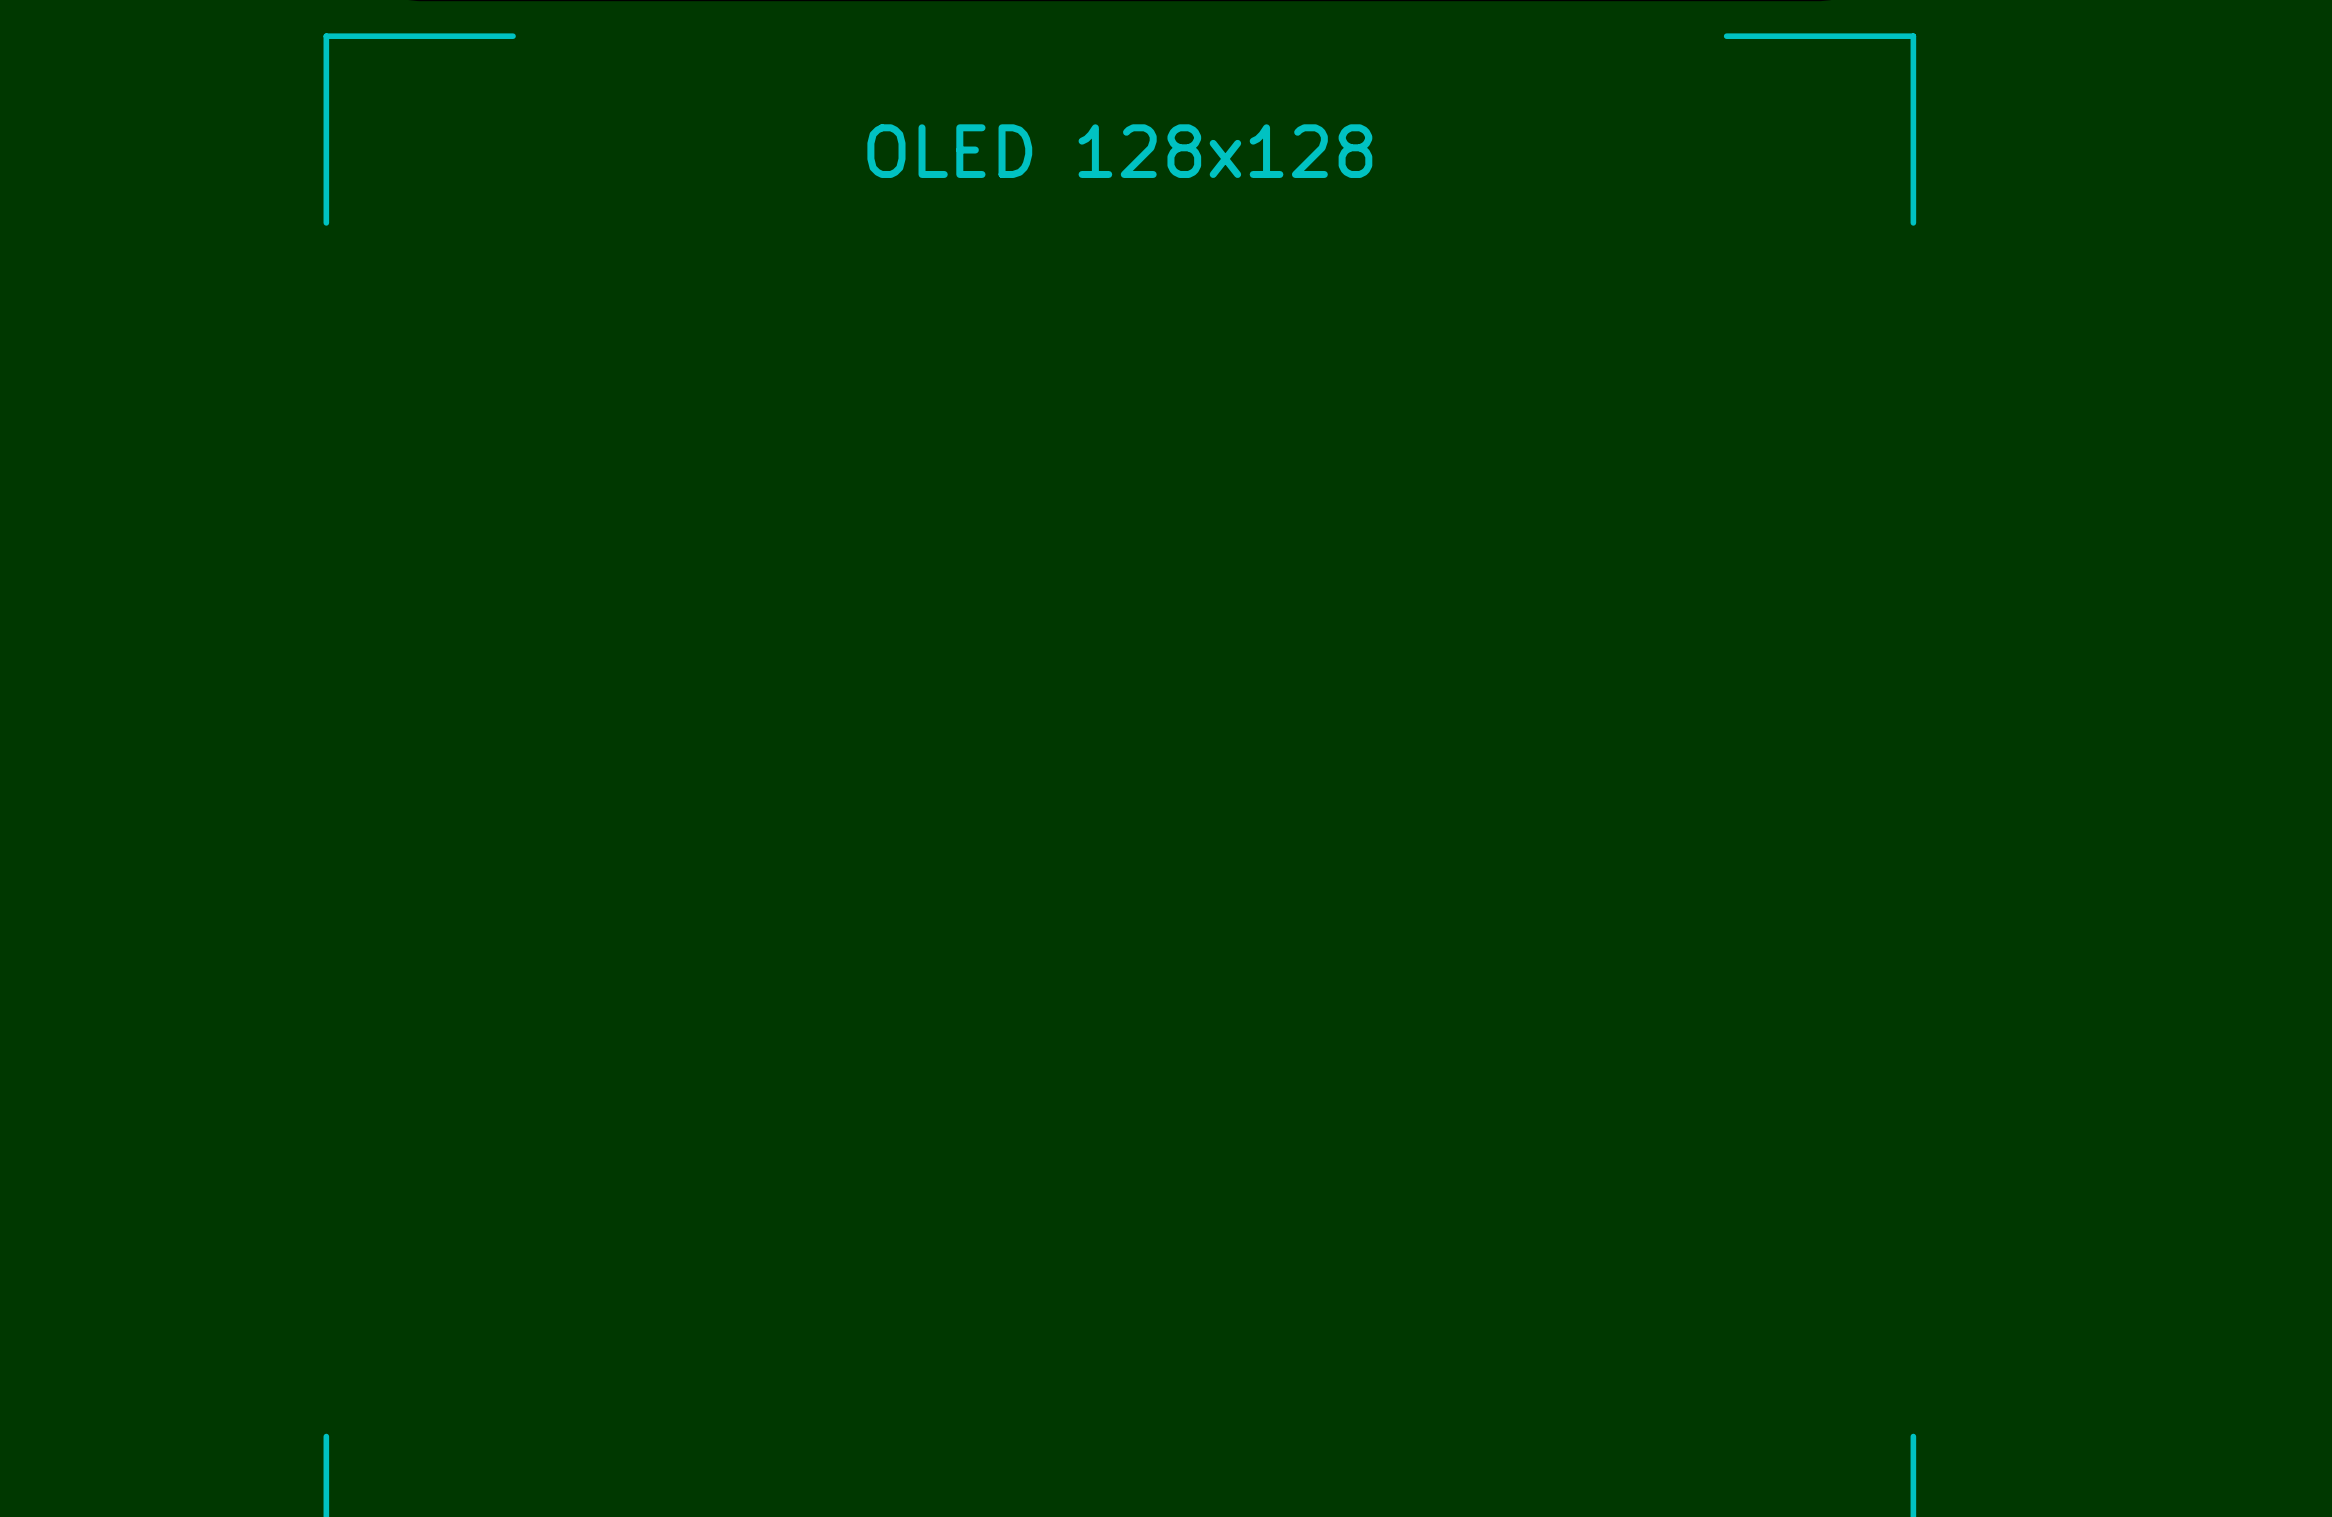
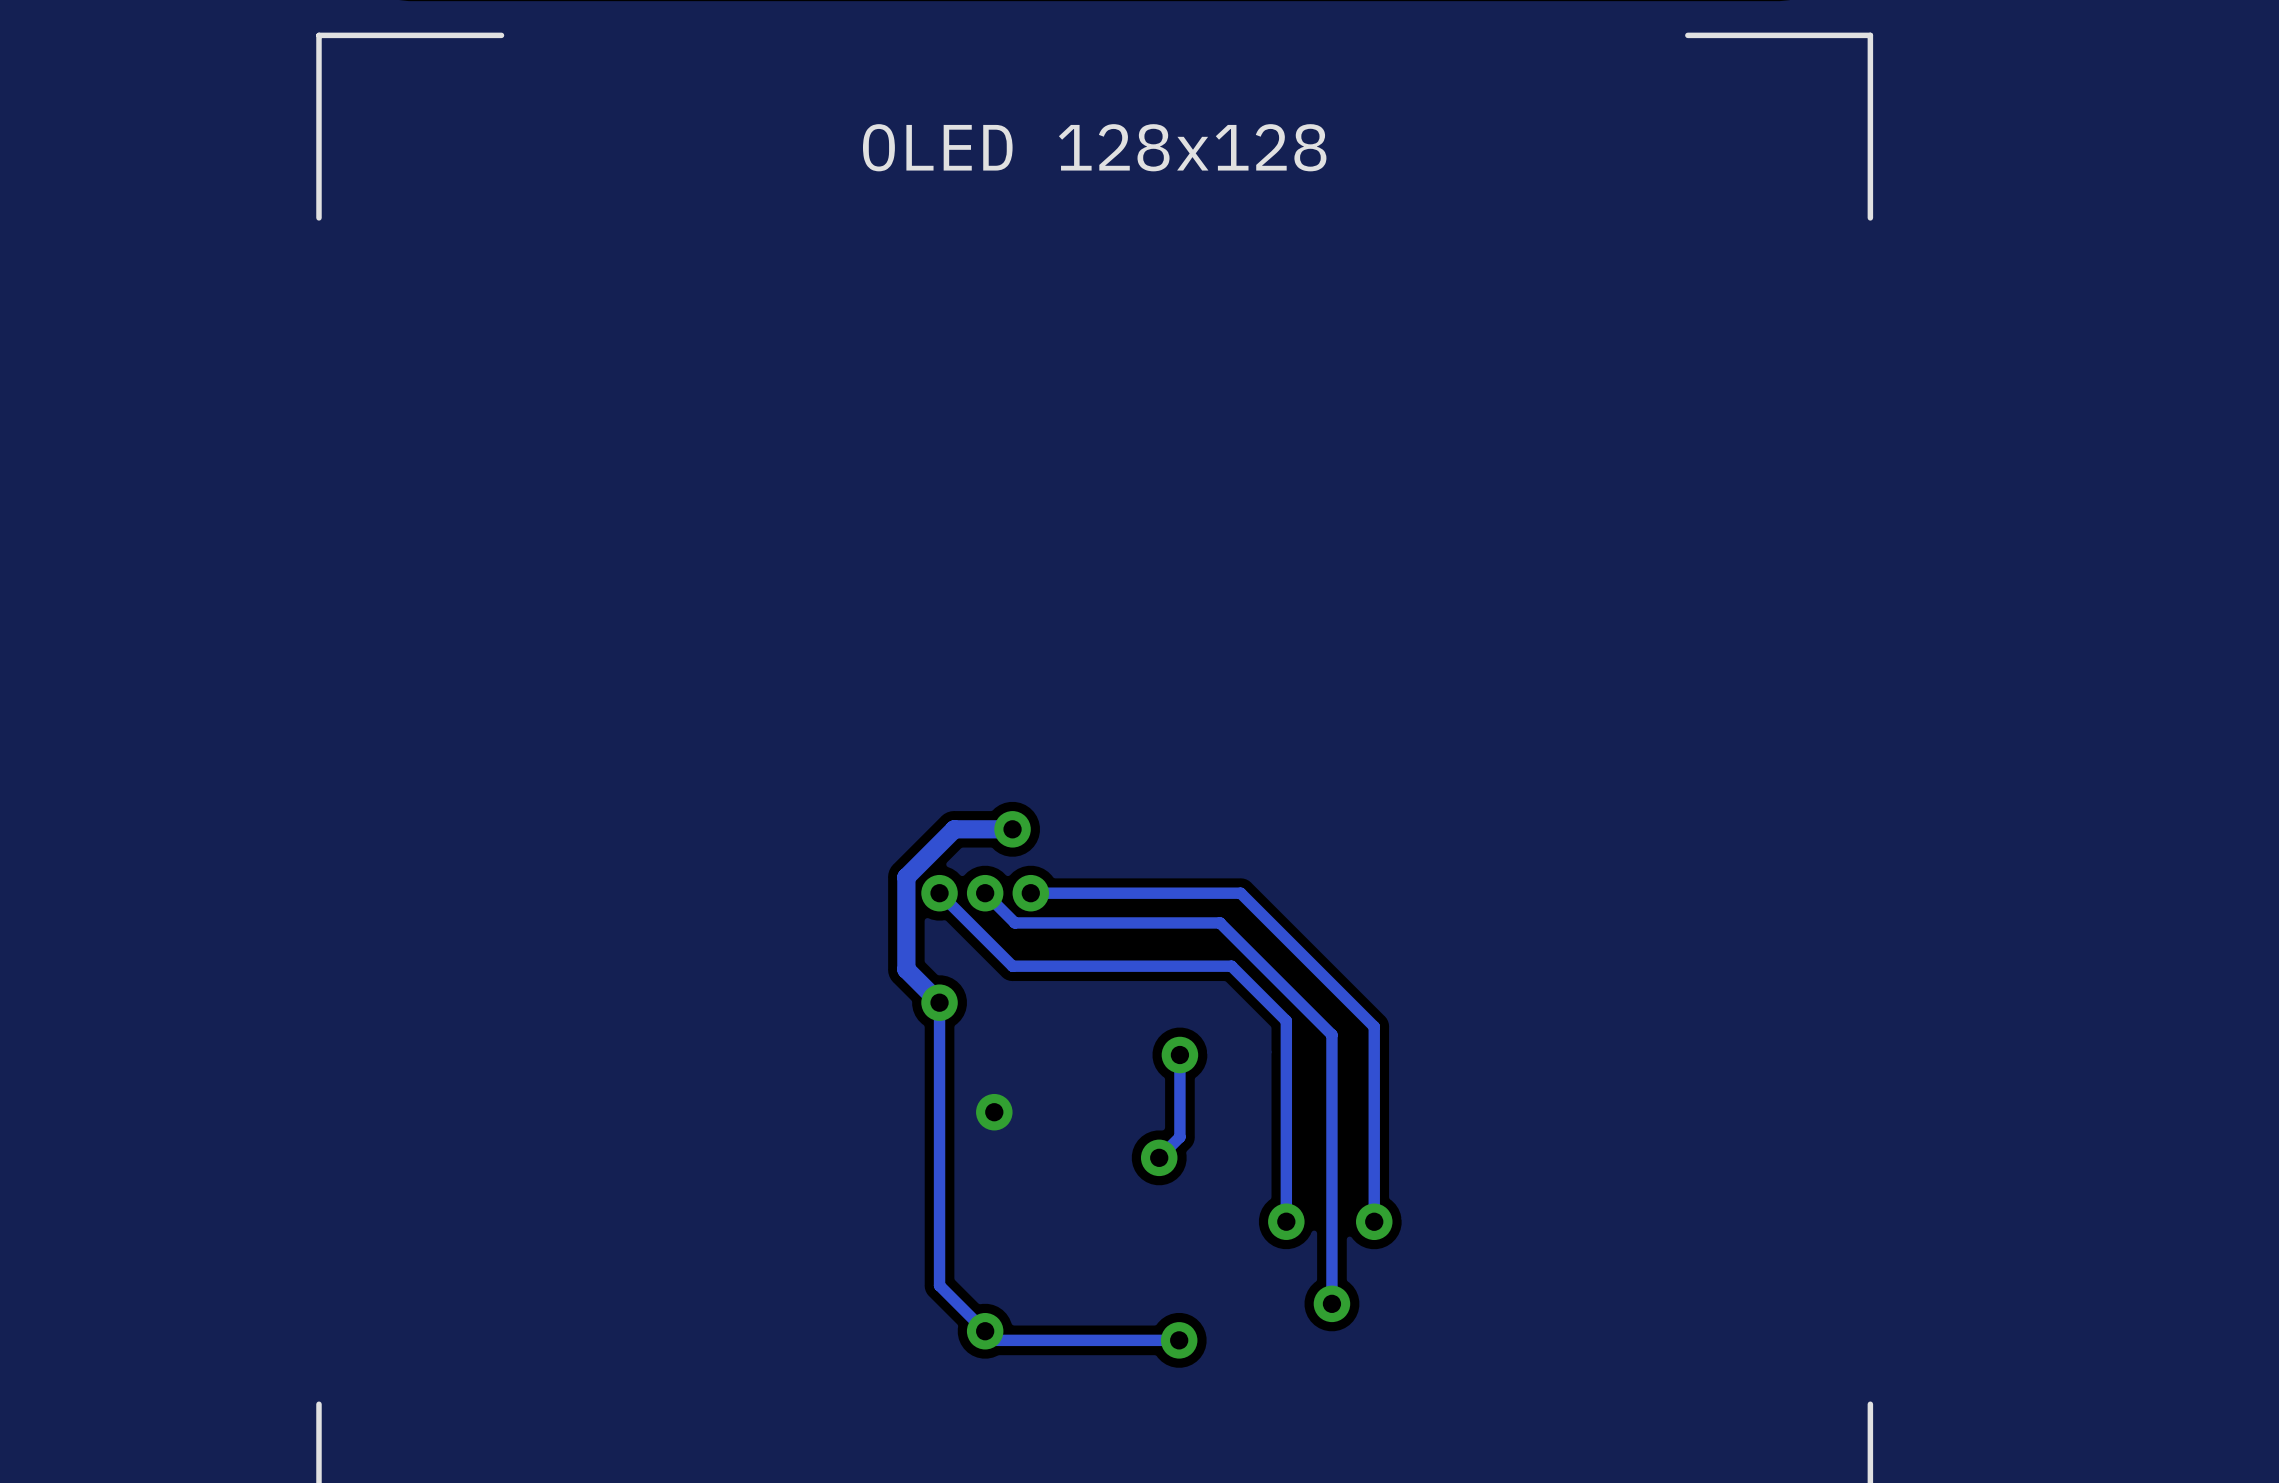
track: none -> (1012, 829) (954, 829) (906, 877) (906, 969) (939, 1002) (939, 1285) (994, 1340) (1179, 1340)
via: none -> (1012, 829)
track: none -> (939, 893) (1012, 966) (1231, 966) (1286, 1020) (1286, 1221)
via: none -> (939, 893)
track: none -> (985, 893) (1014, 922) (1220, 922) (1331, 1034) (1331, 1303)
via: none -> (985, 893)
track: none -> (1030, 893) (1240, 893) (1374, 1026) (1374, 1221)
via: none -> (1030, 893)
via: none -> (939, 1002)
track: none -> (1179, 1055) (1179, 1137) (1159, 1157)
via: none -> (1179, 1055)
via: none -> (994, 1112)
via: none -> (1159, 1157)
via: none -> (1286, 1221)
via: none -> (1374, 1221)
via: none -> (1331, 1303)
via: none -> (985, 1331)
via: none -> (1179, 1340)

